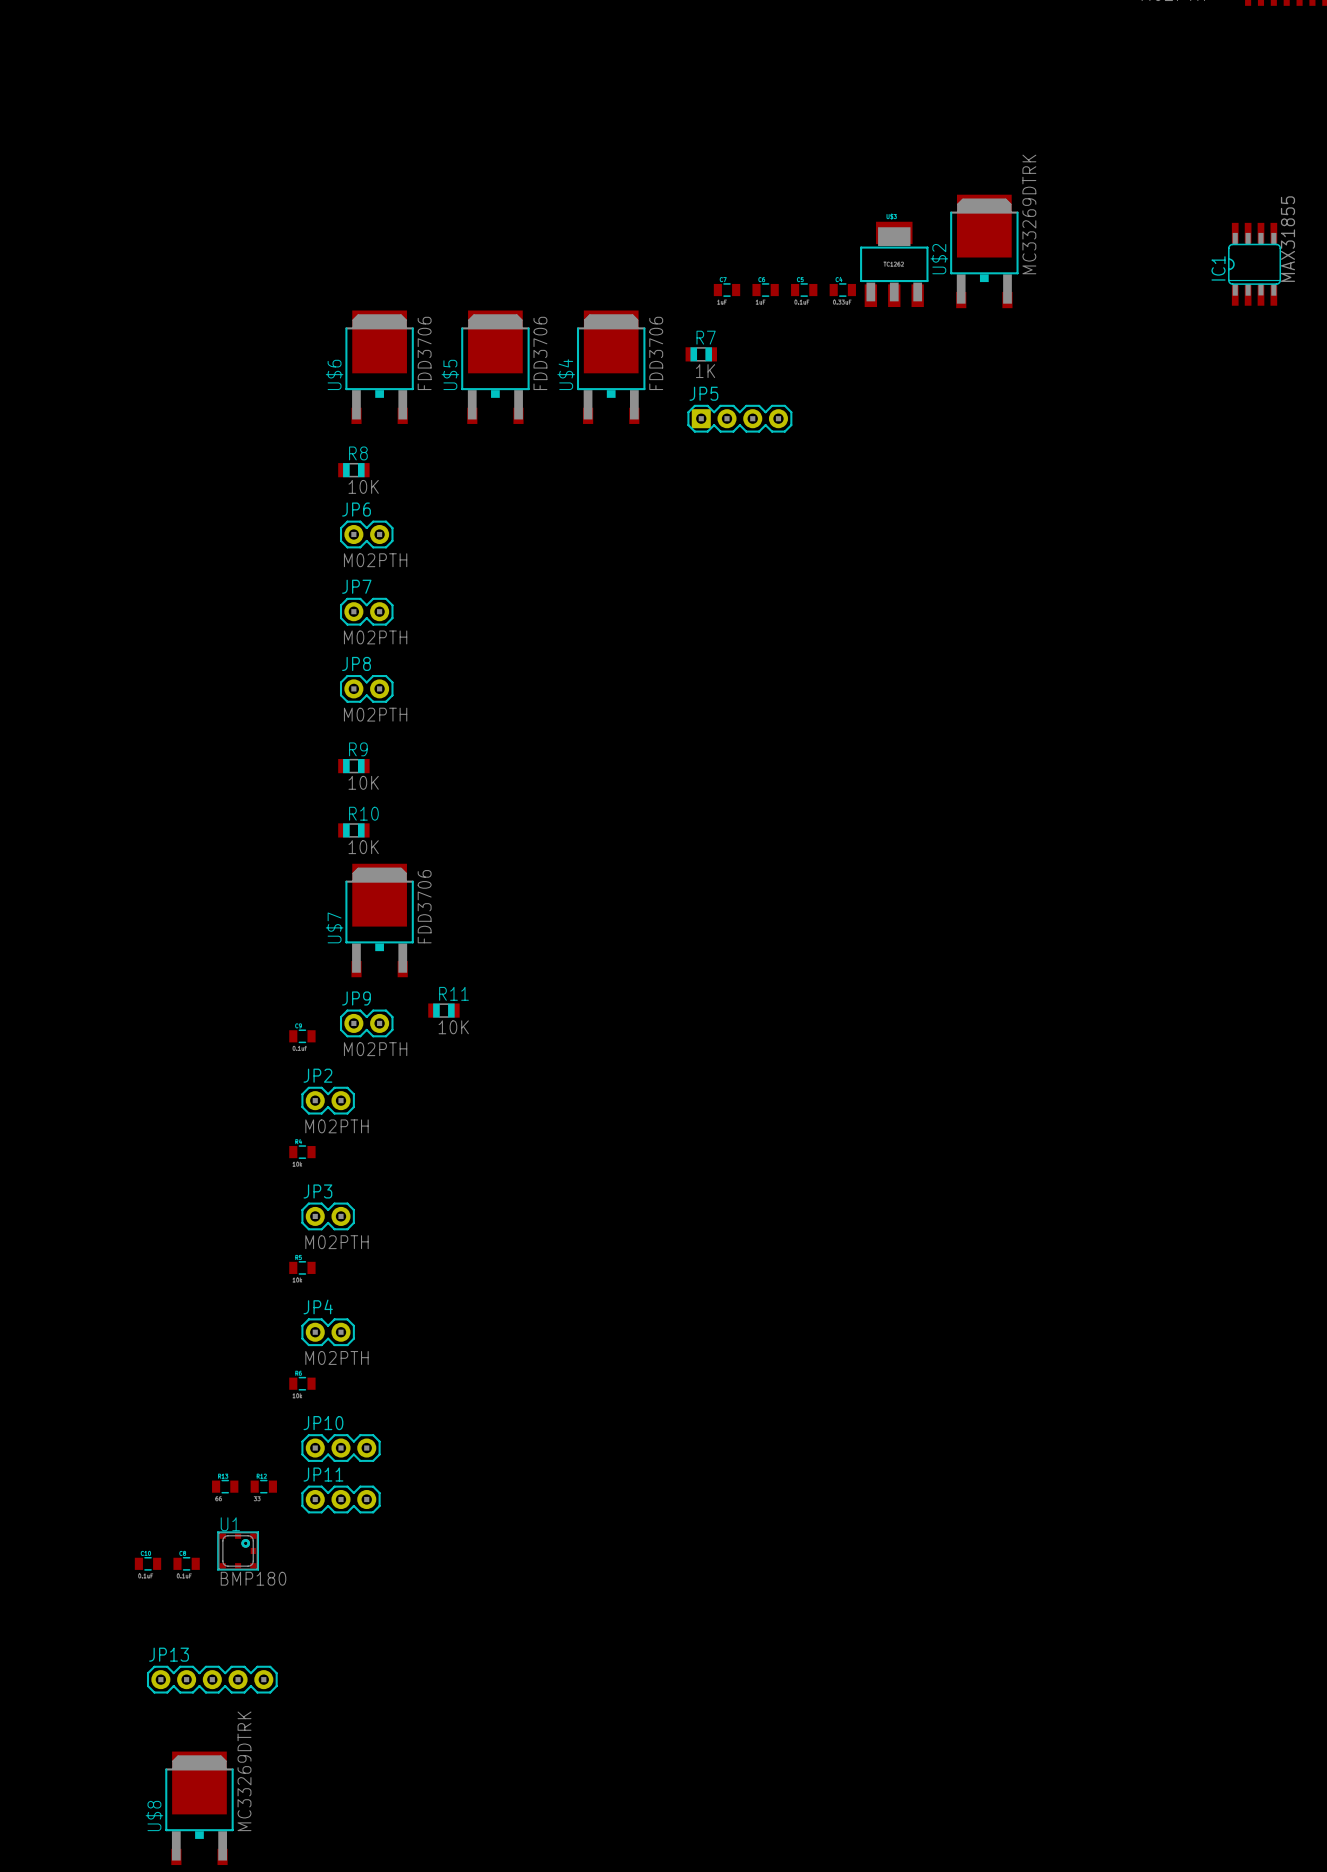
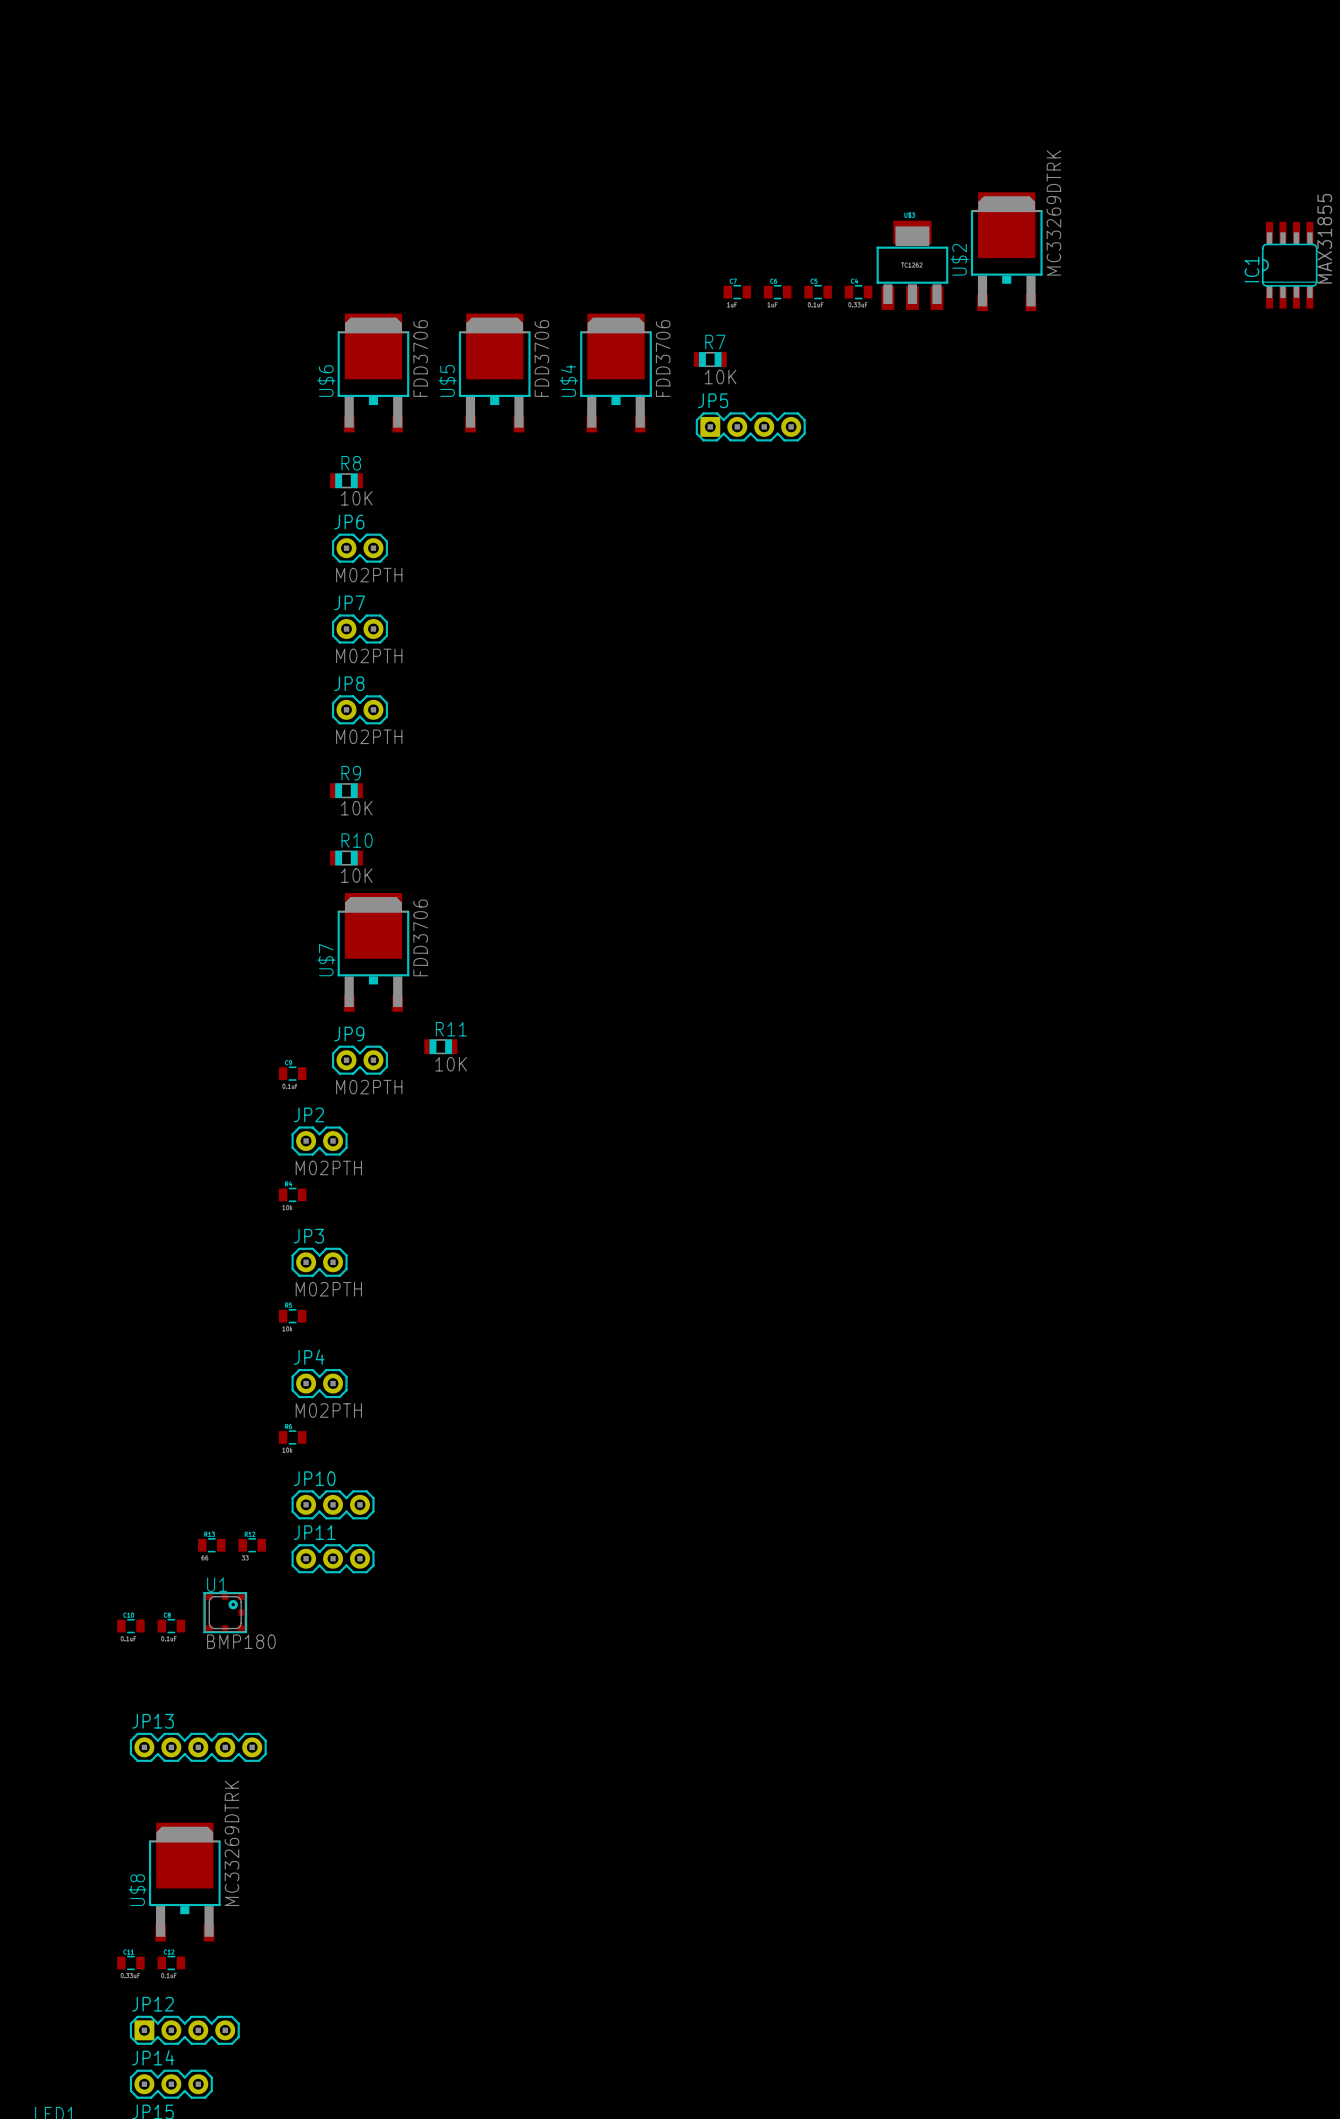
R7 value: 1K (705, 371) -> 10K (720, 377)

